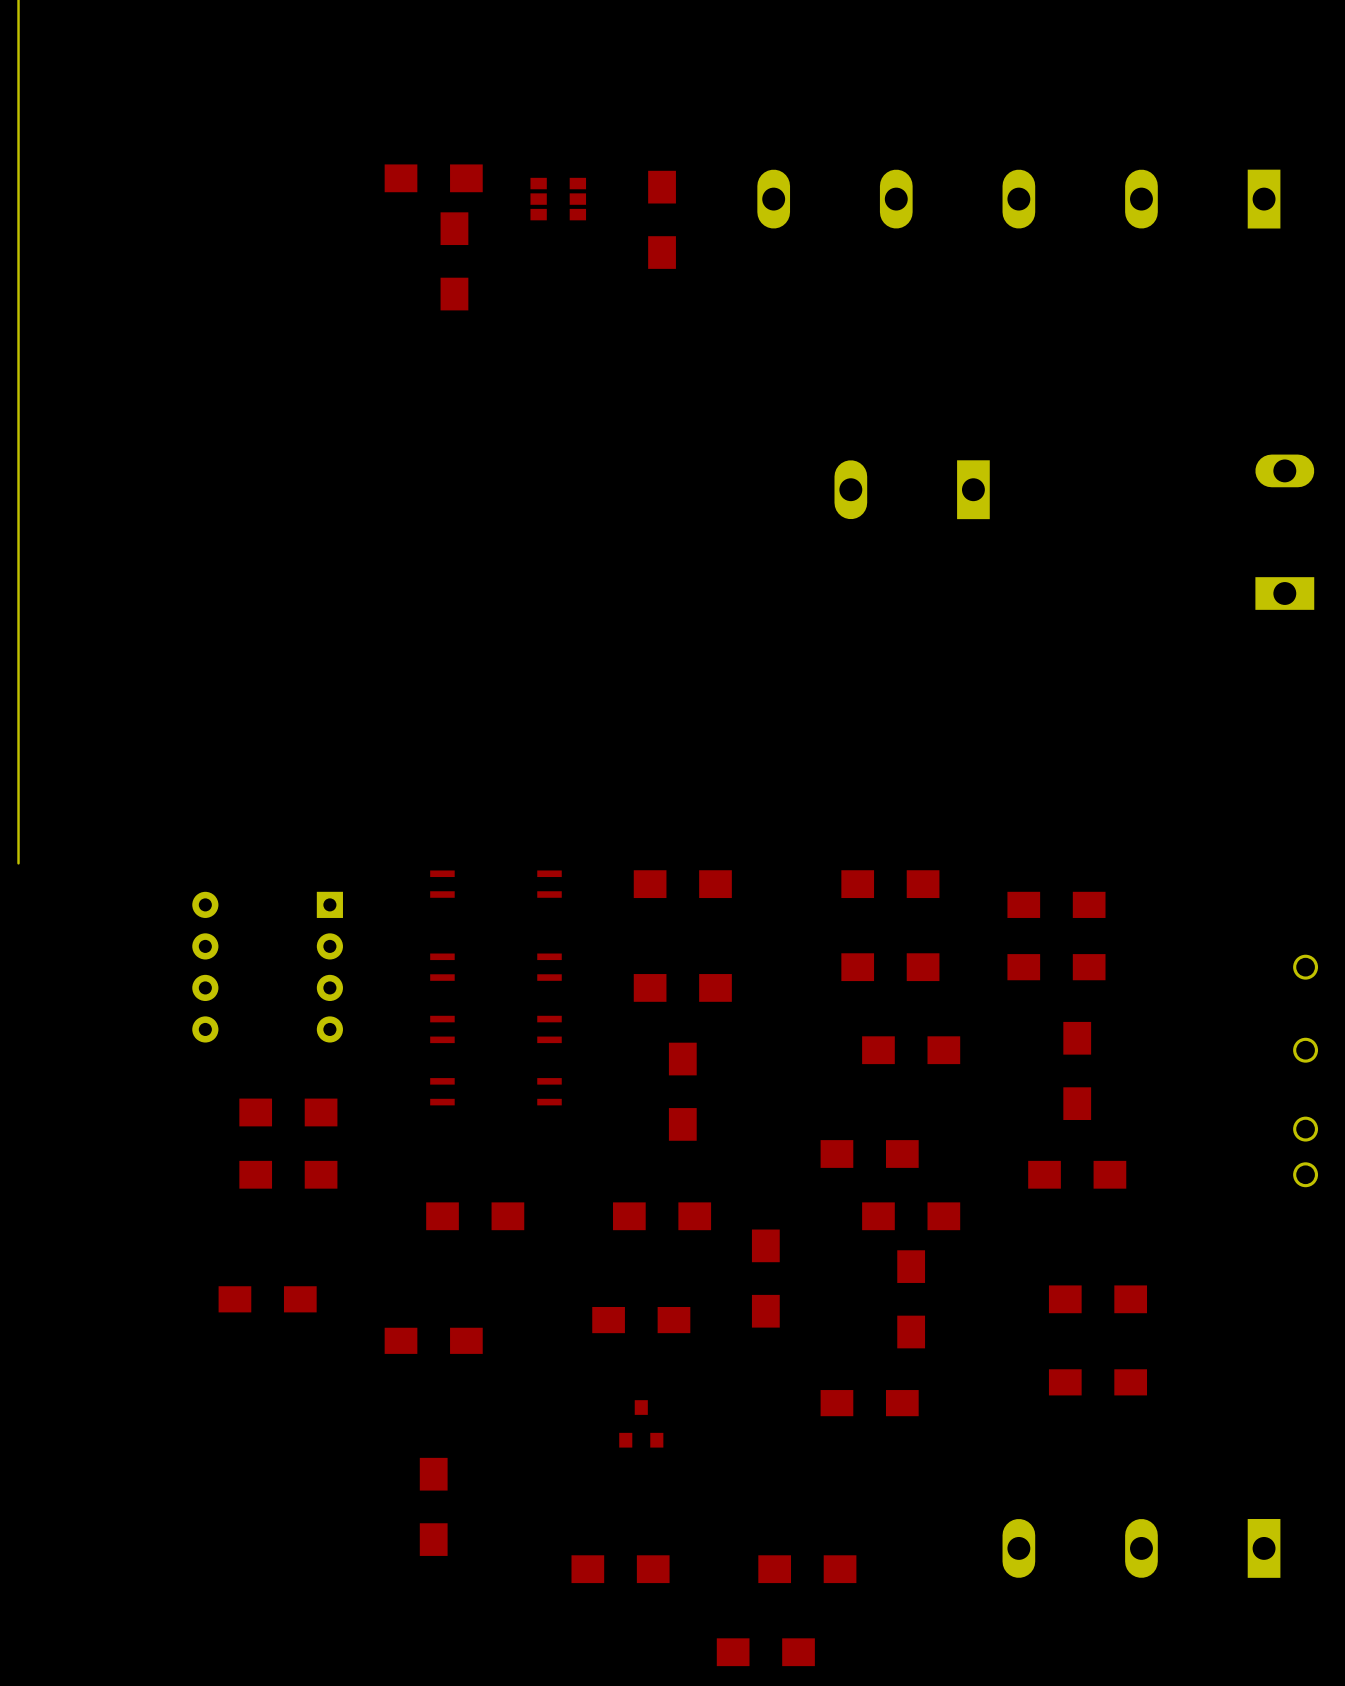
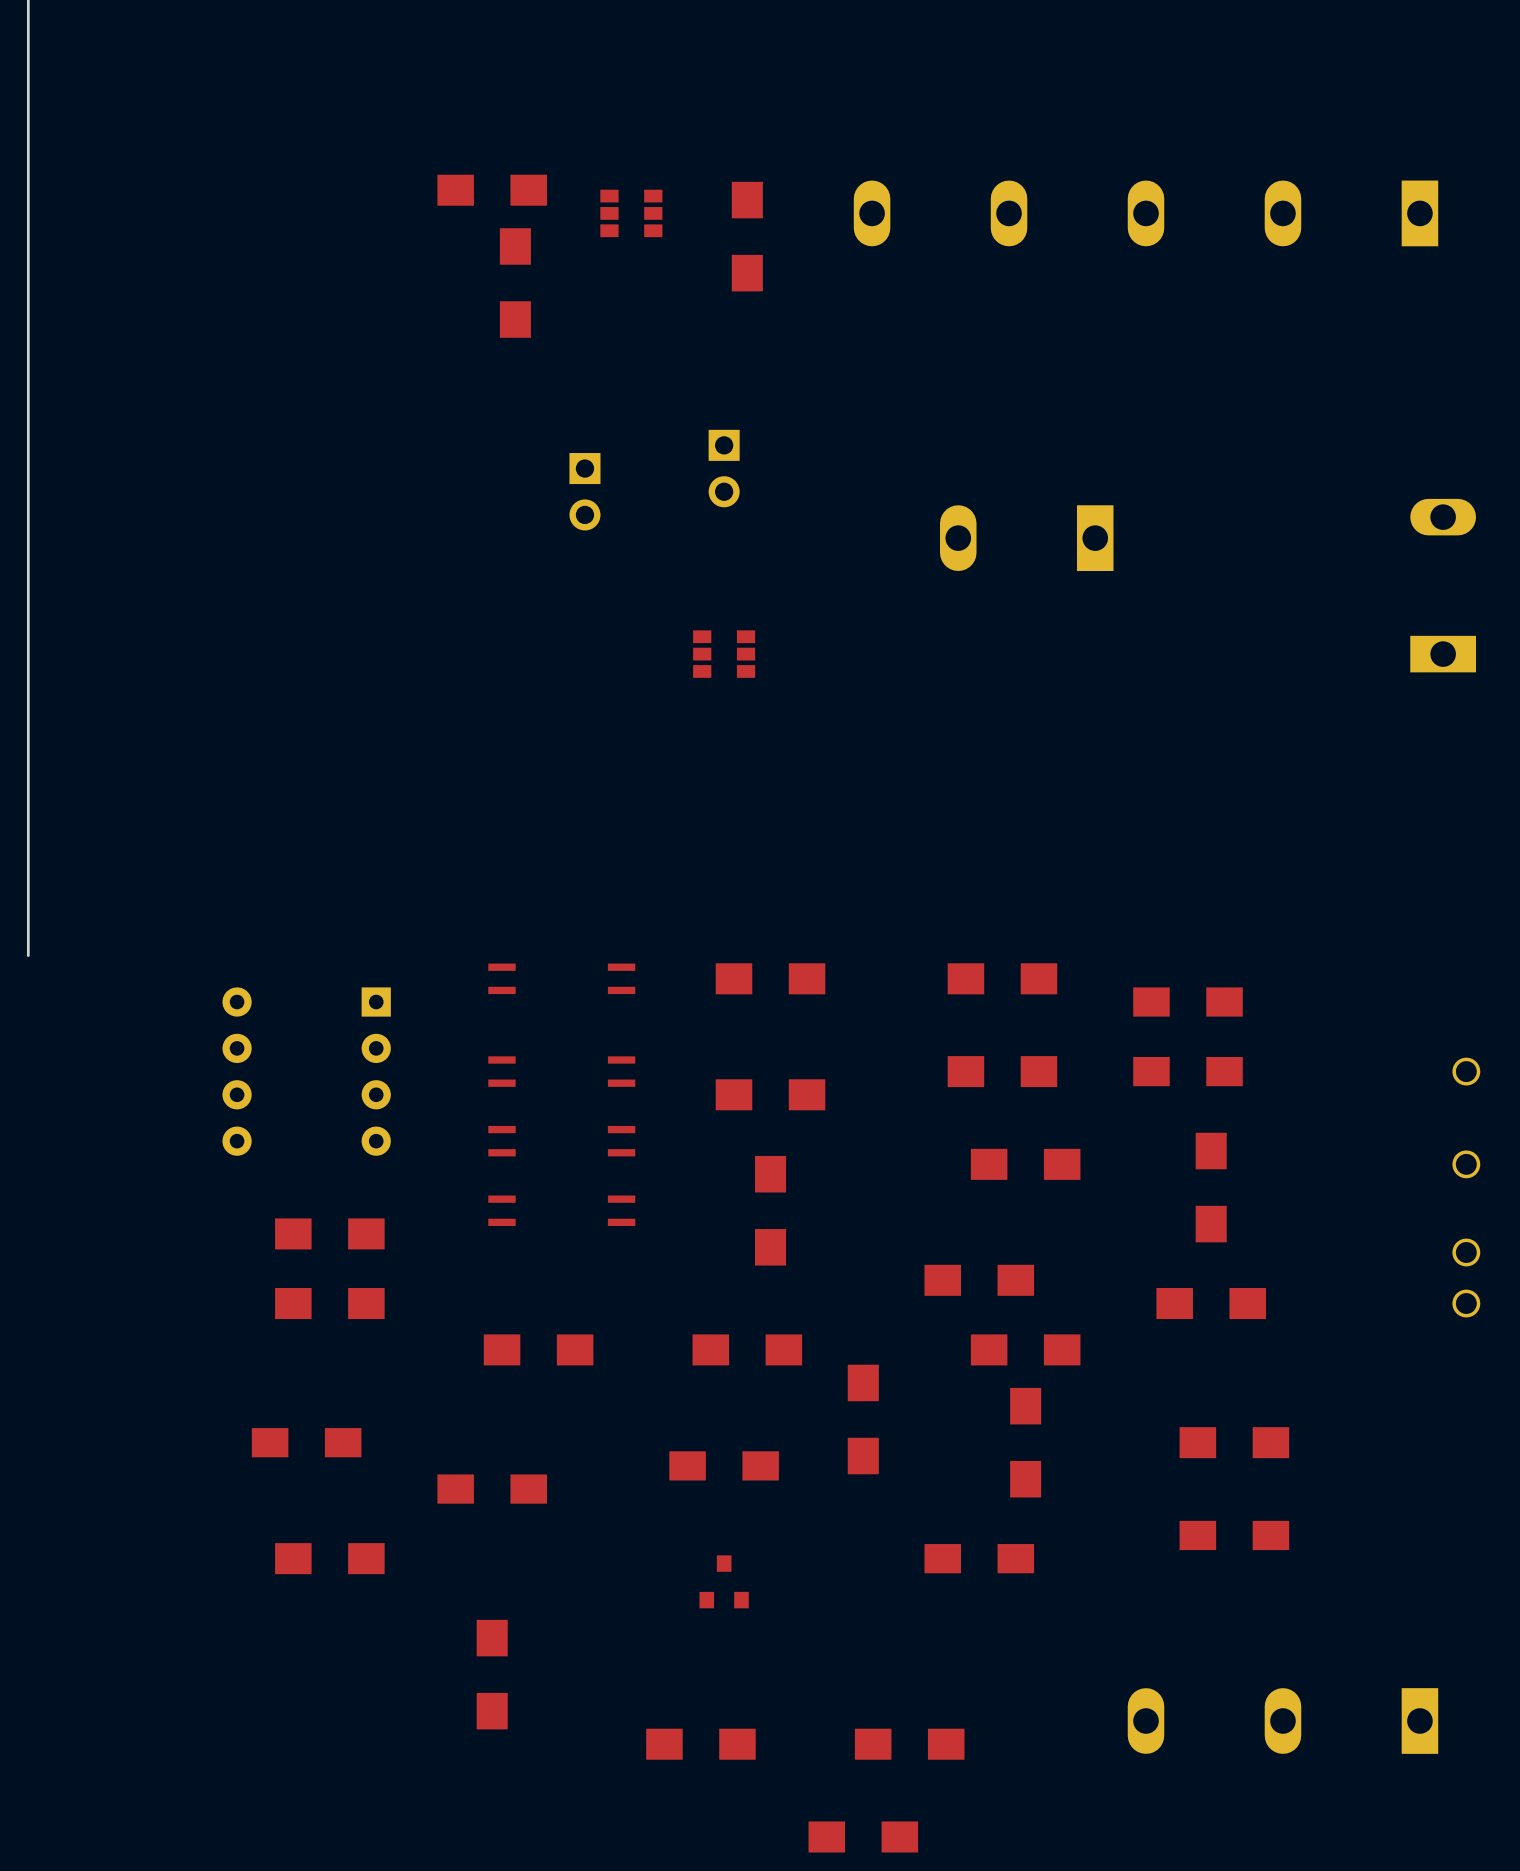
part: none -> (724, 468)
part: none -> (584, 491)
part: none -> (724, 654)
part: none -> (329, 1558)

